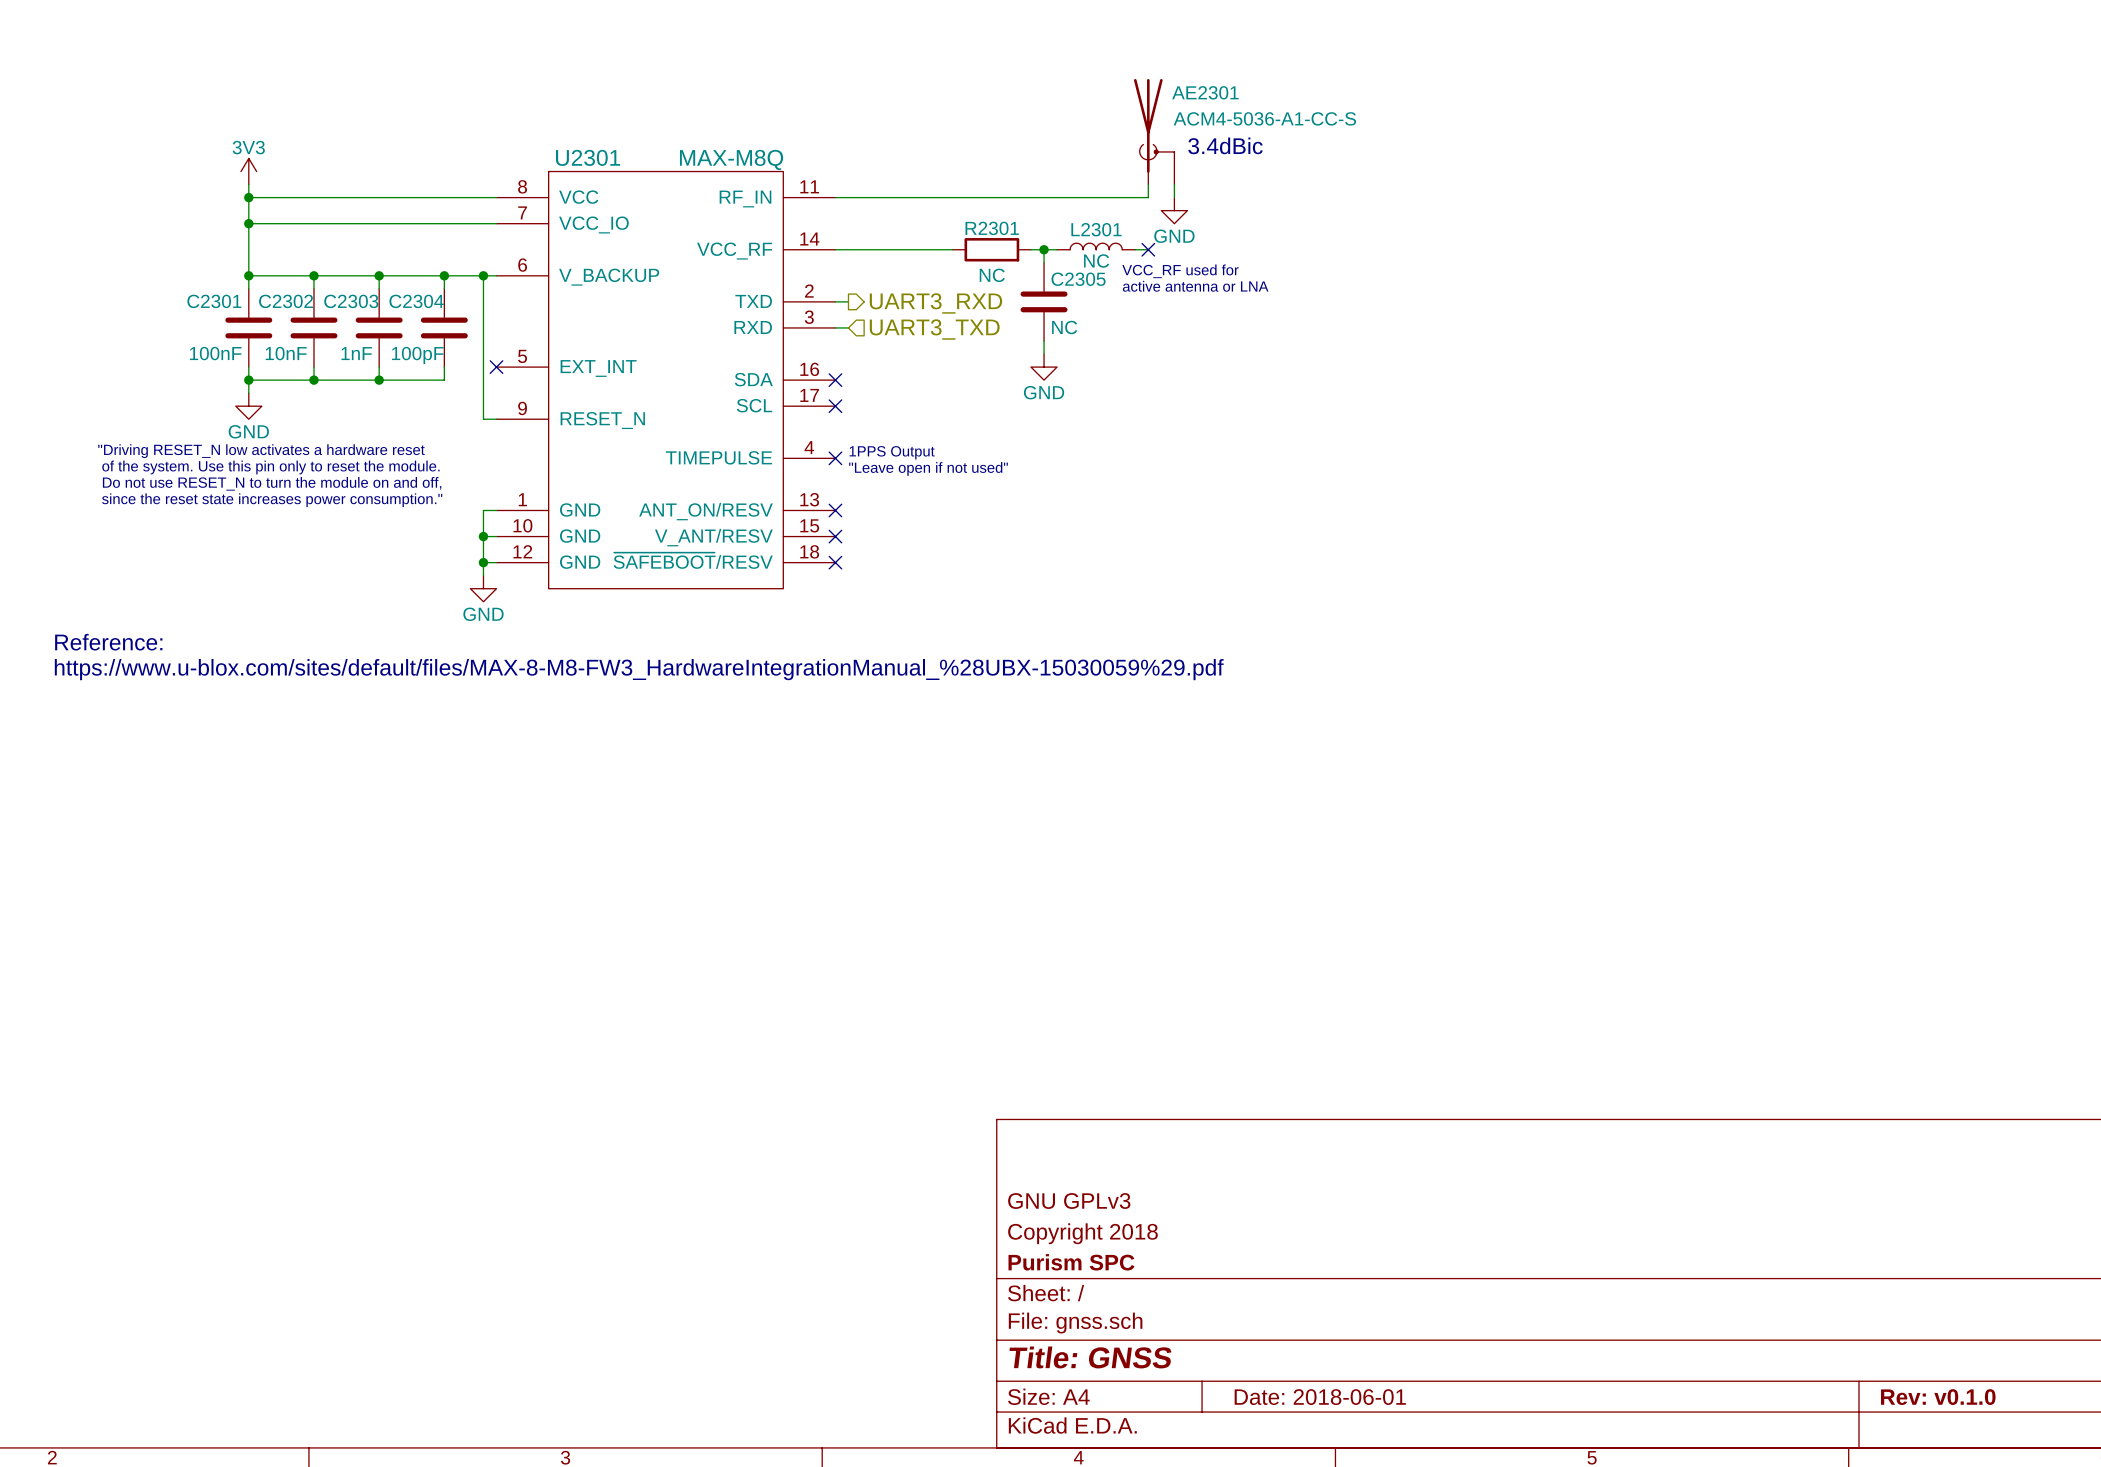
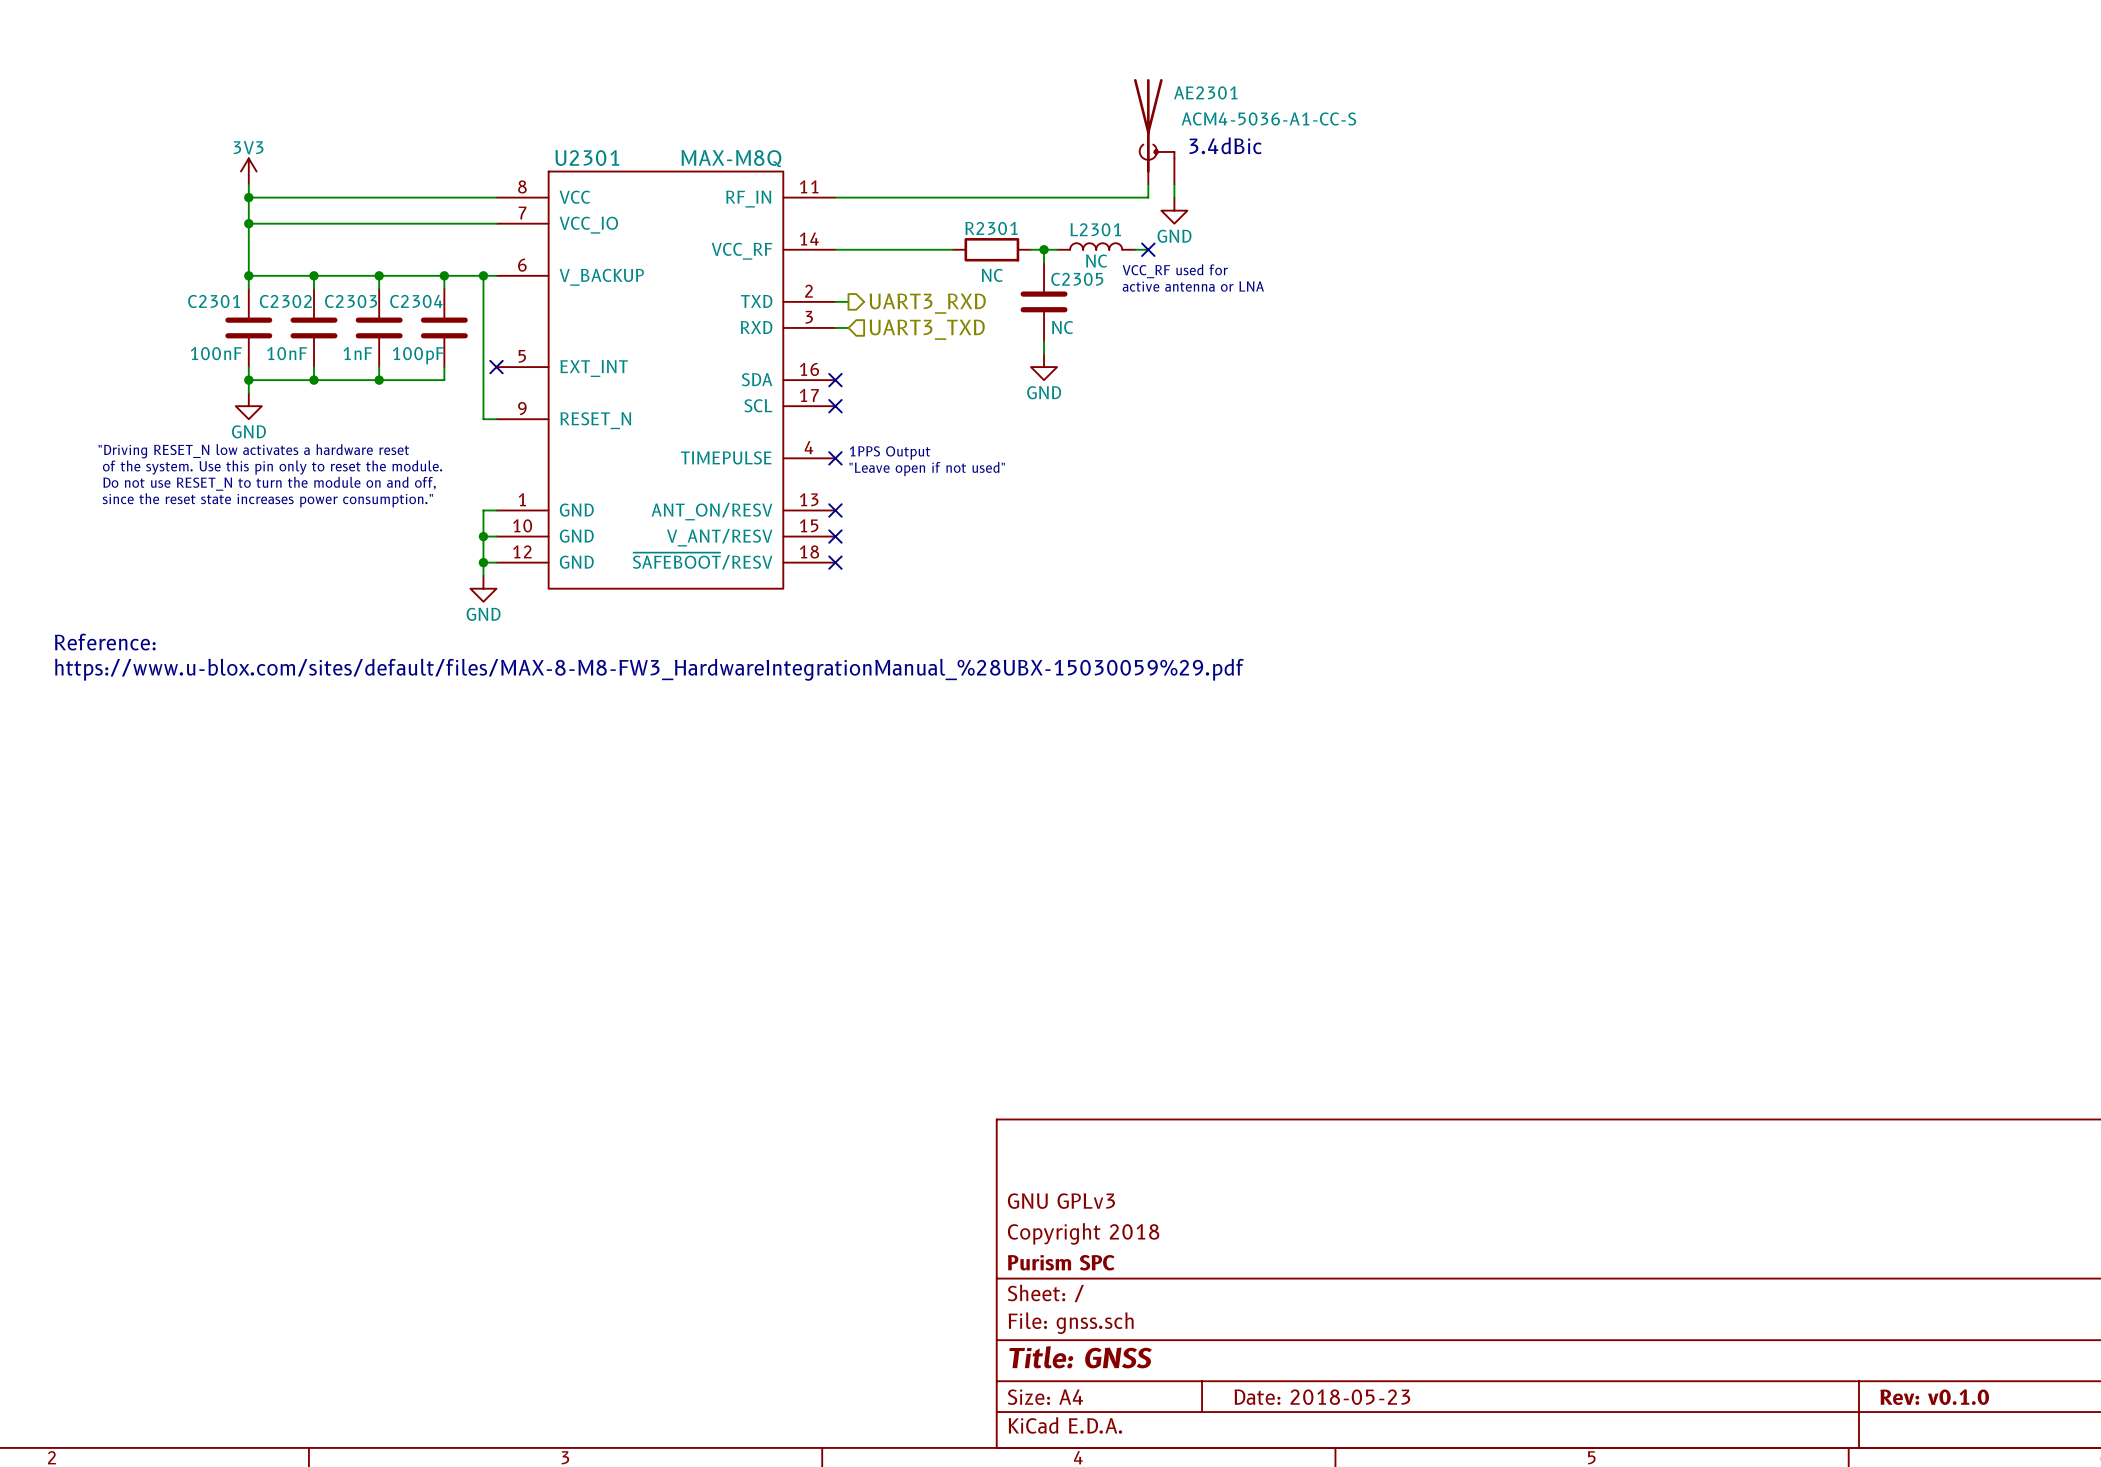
title block: Date: 2018-06-01 (1320, 1397) -> Date: 2018-05-23 (1322, 1397)

